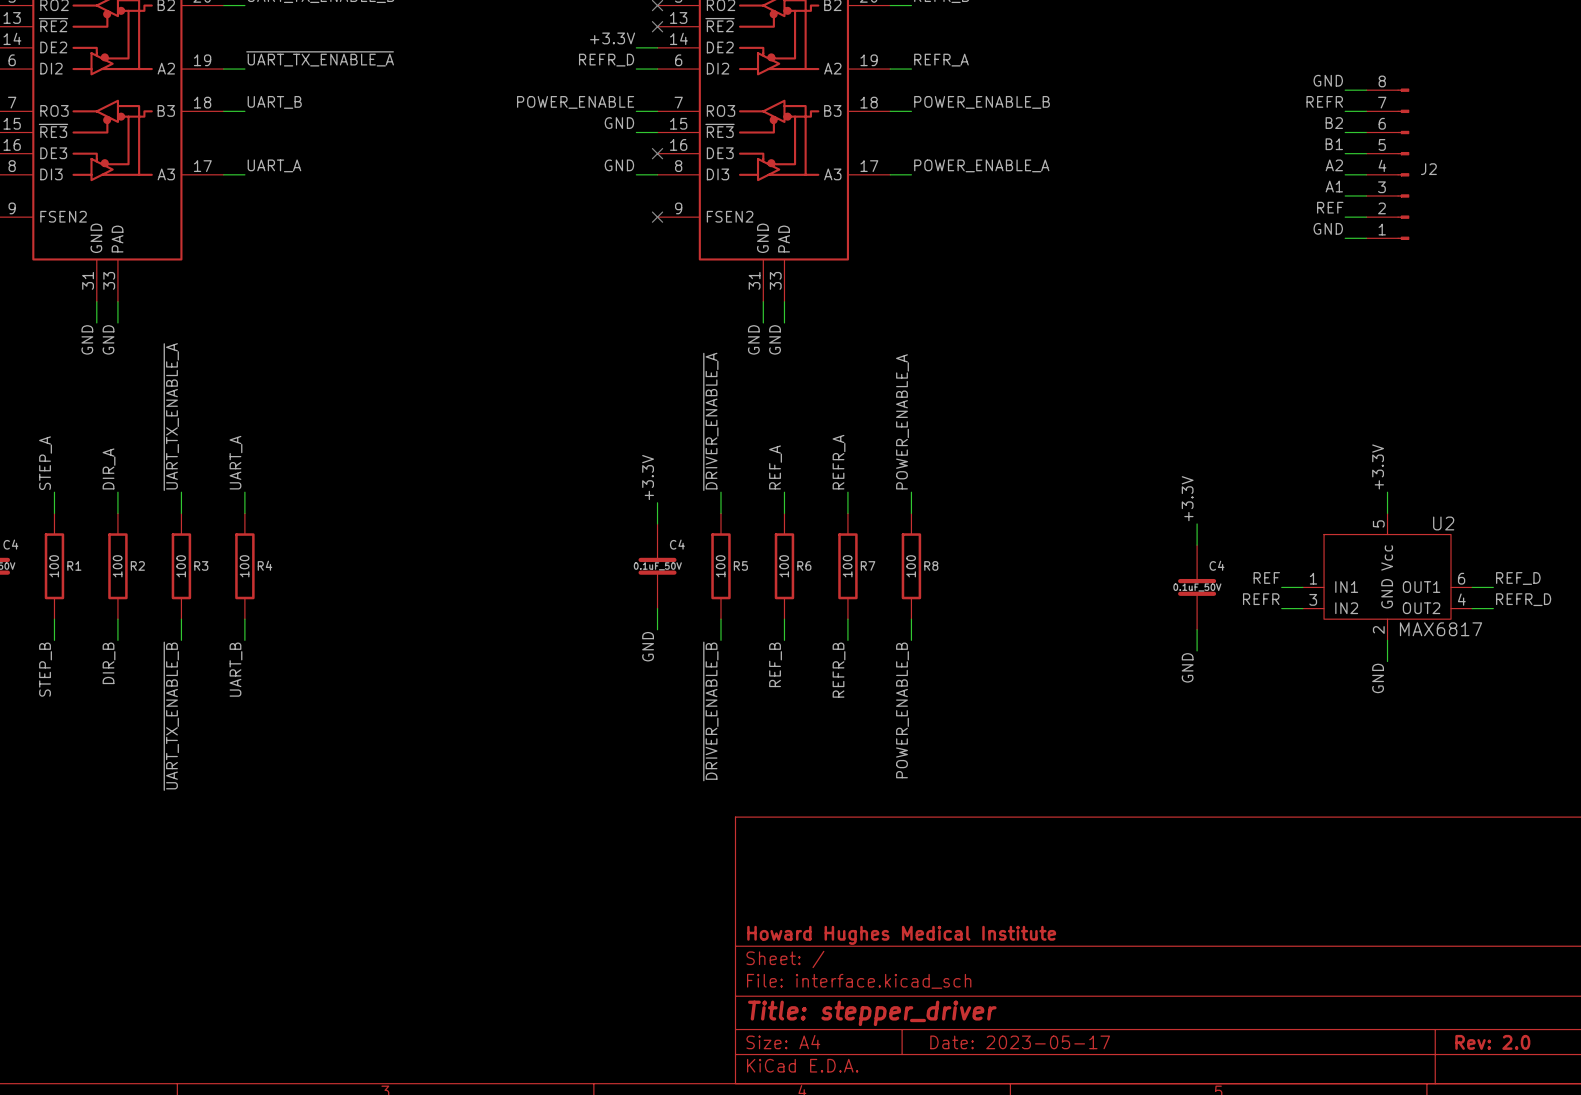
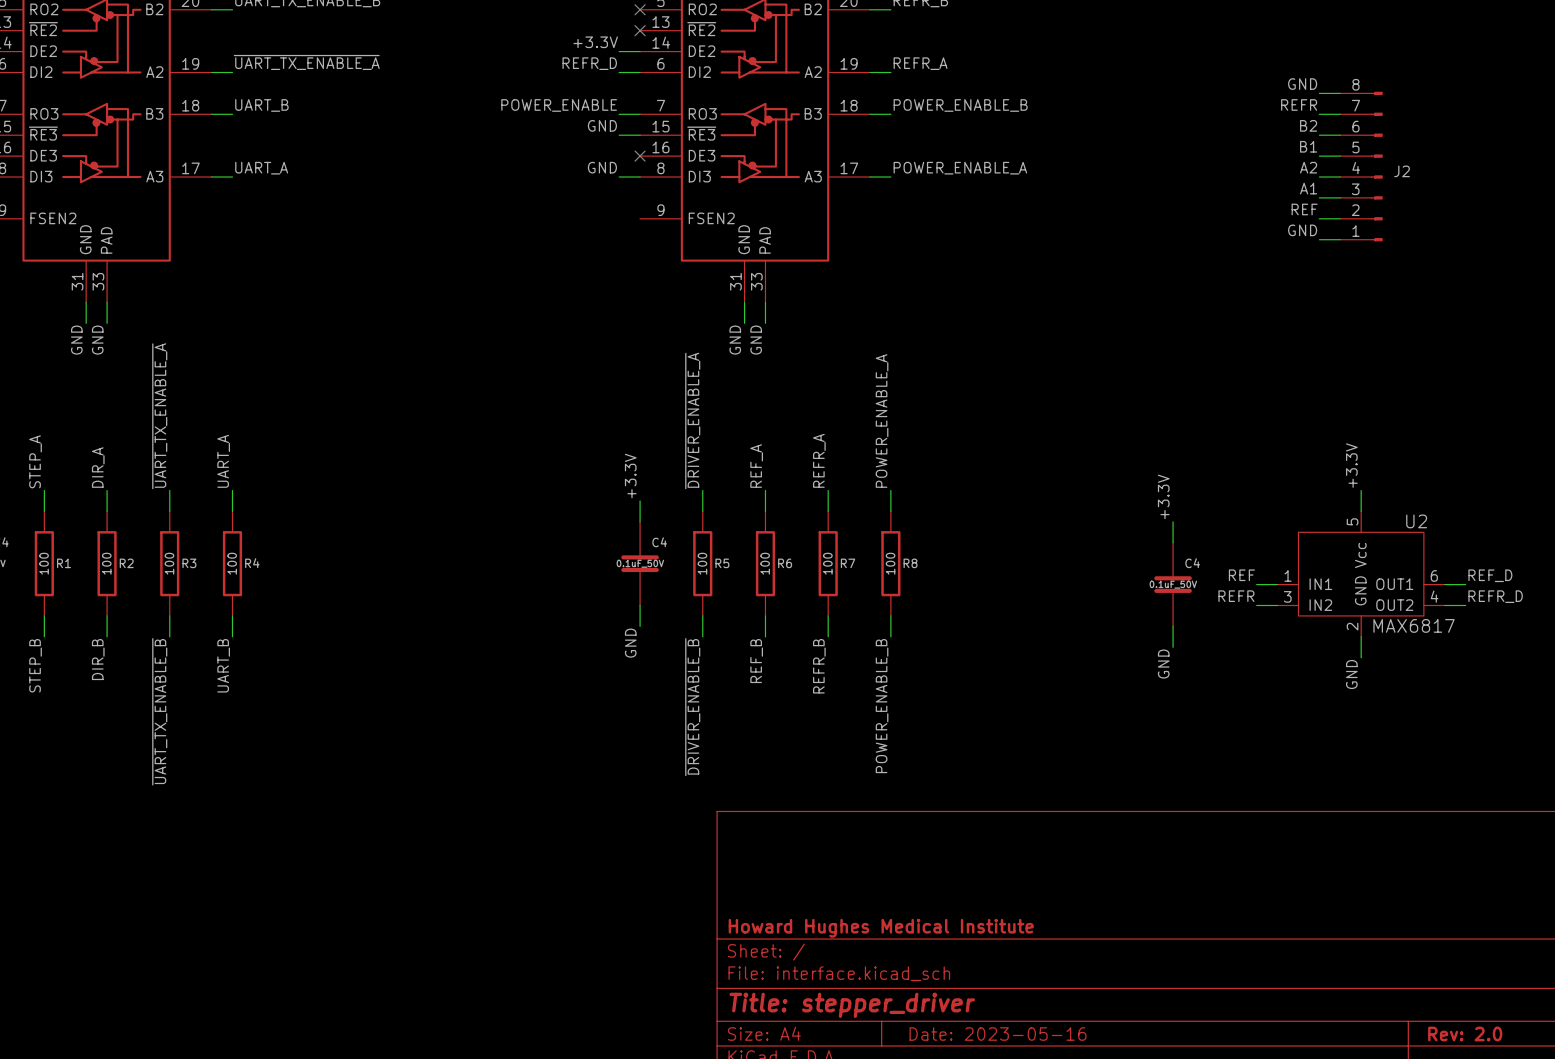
no-connect mark: (657, 217) -> none
title block: Date: 2023-05-17 (1020, 1042) -> Date: 2023-05-16 (997, 1034)

